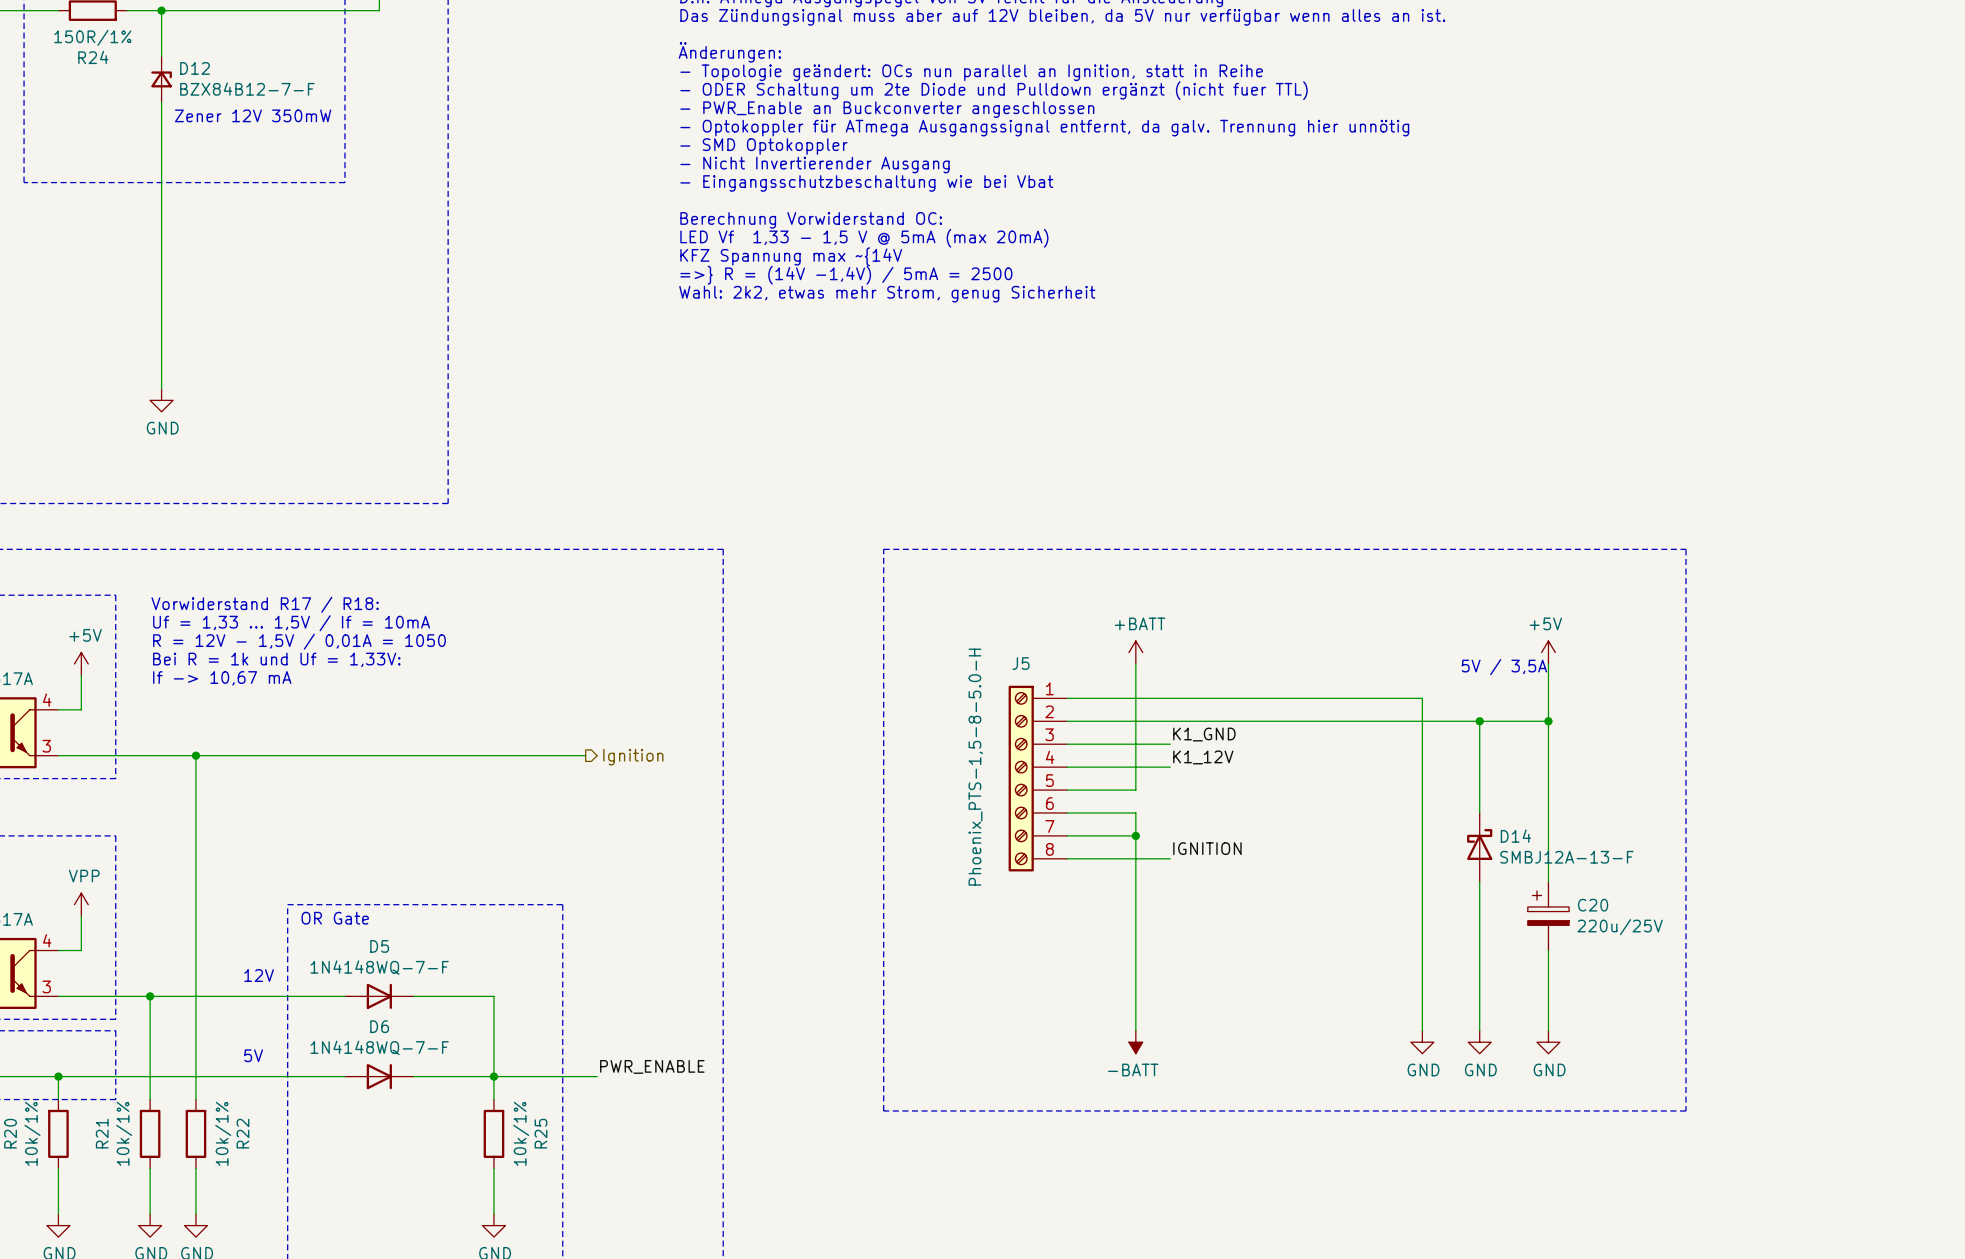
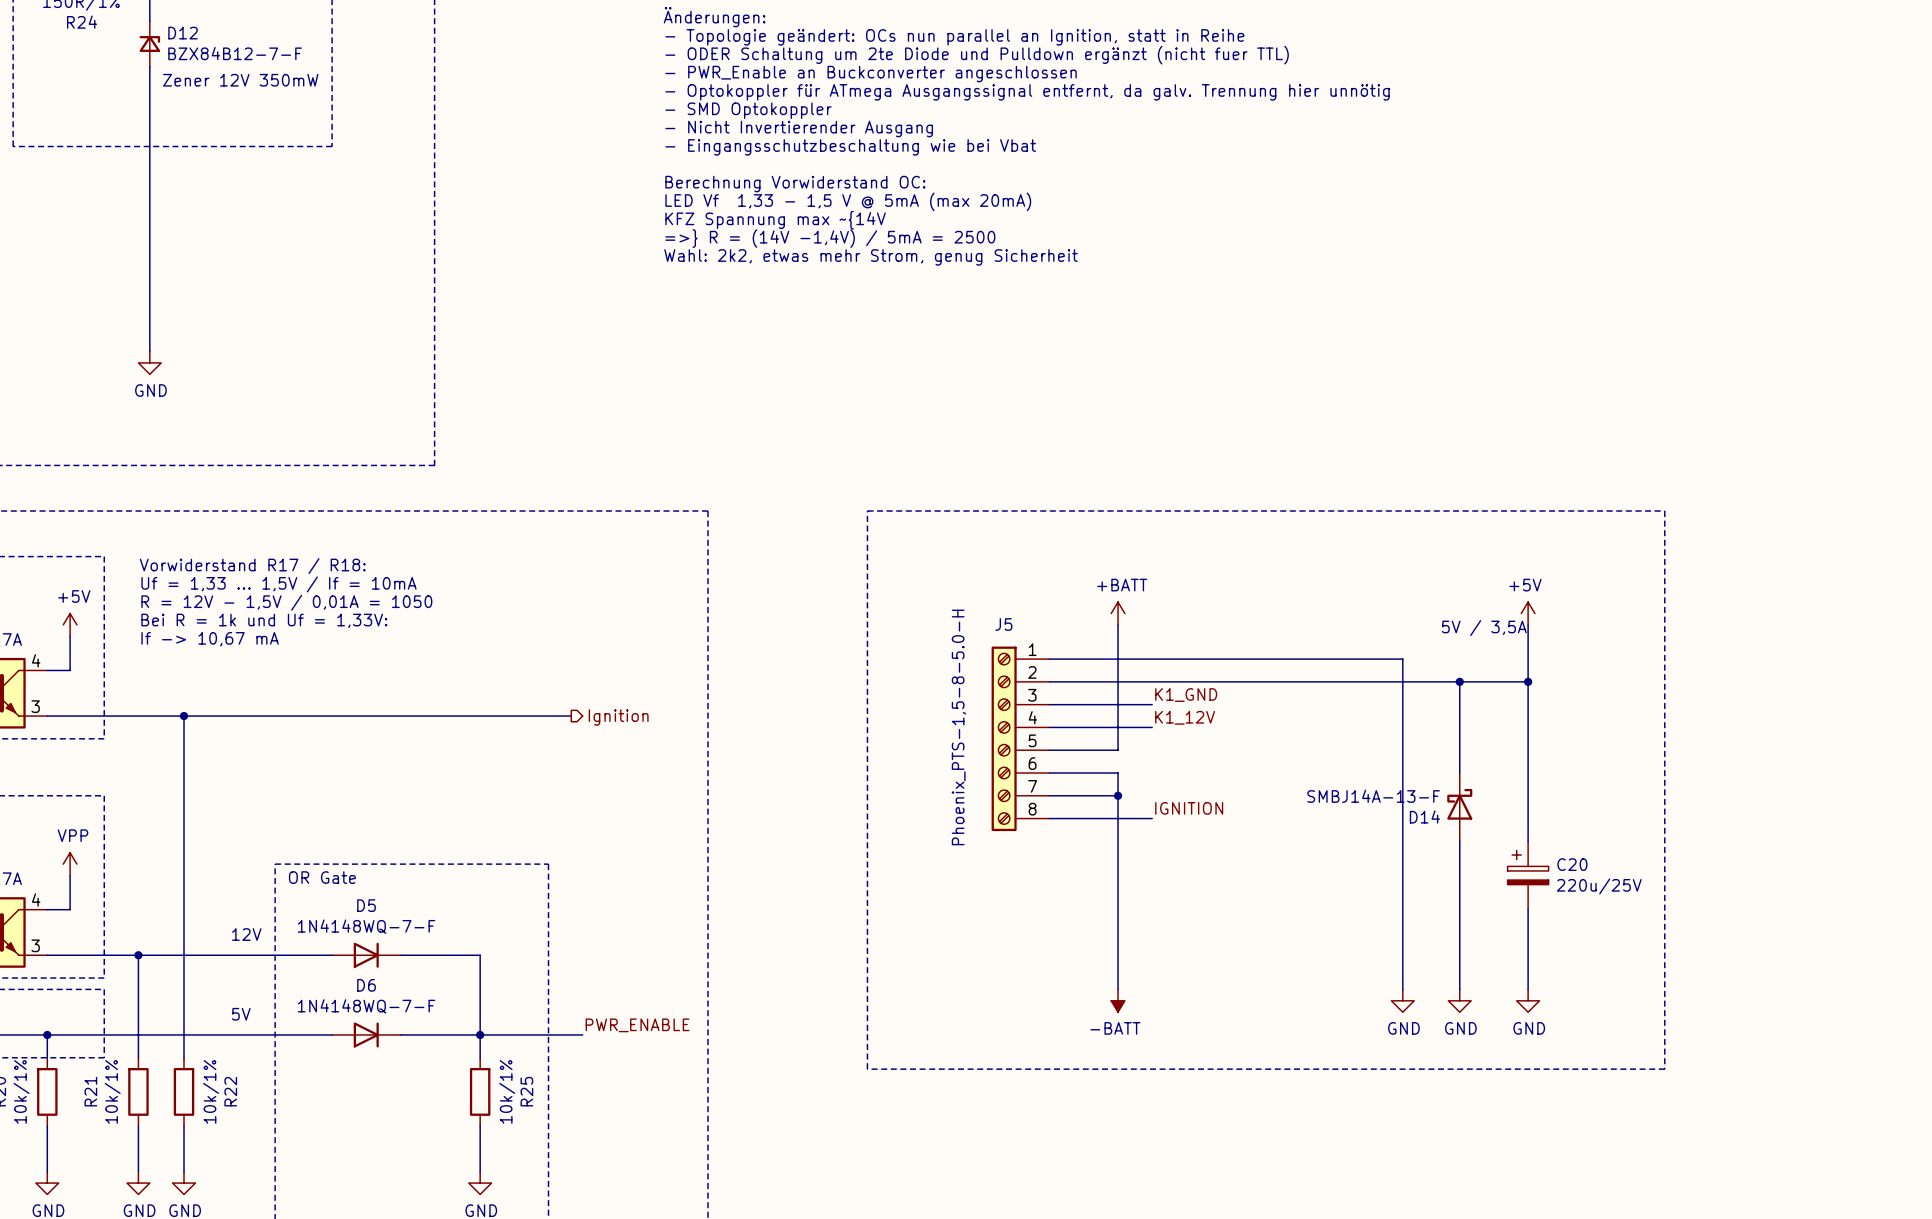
D14 name position: D14 (1515, 836) -> D14 (1424, 816)
D14 value: SMBJ12A-13-F (1566, 857) -> SMBJ14A-13-F (1373, 796)

